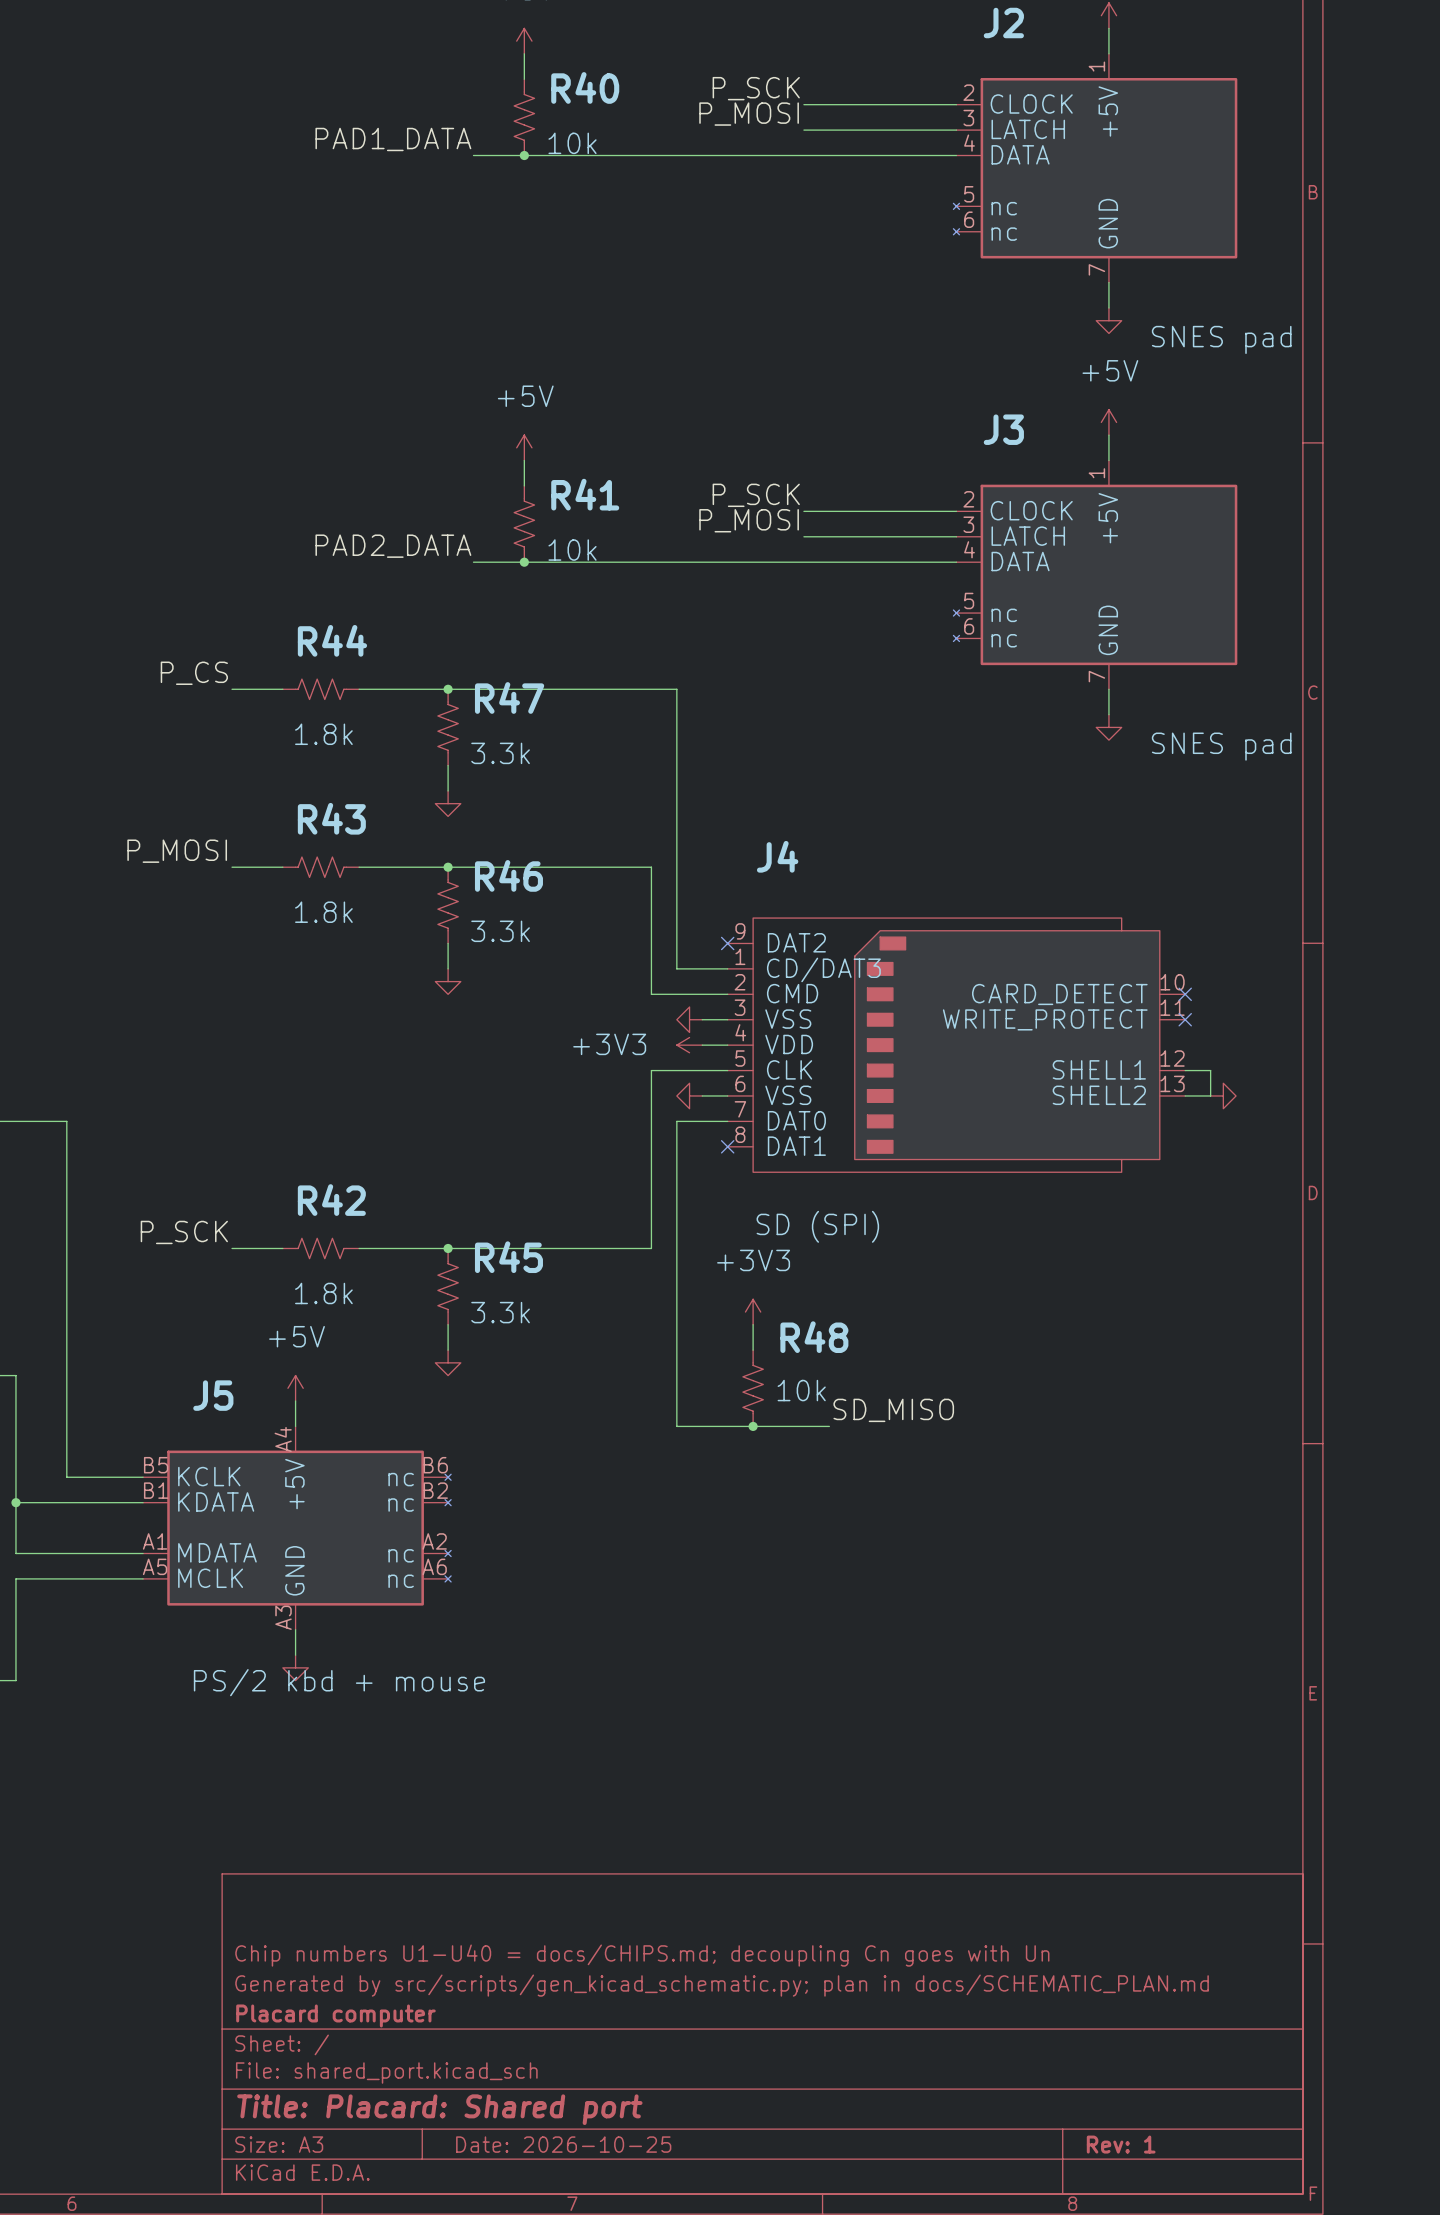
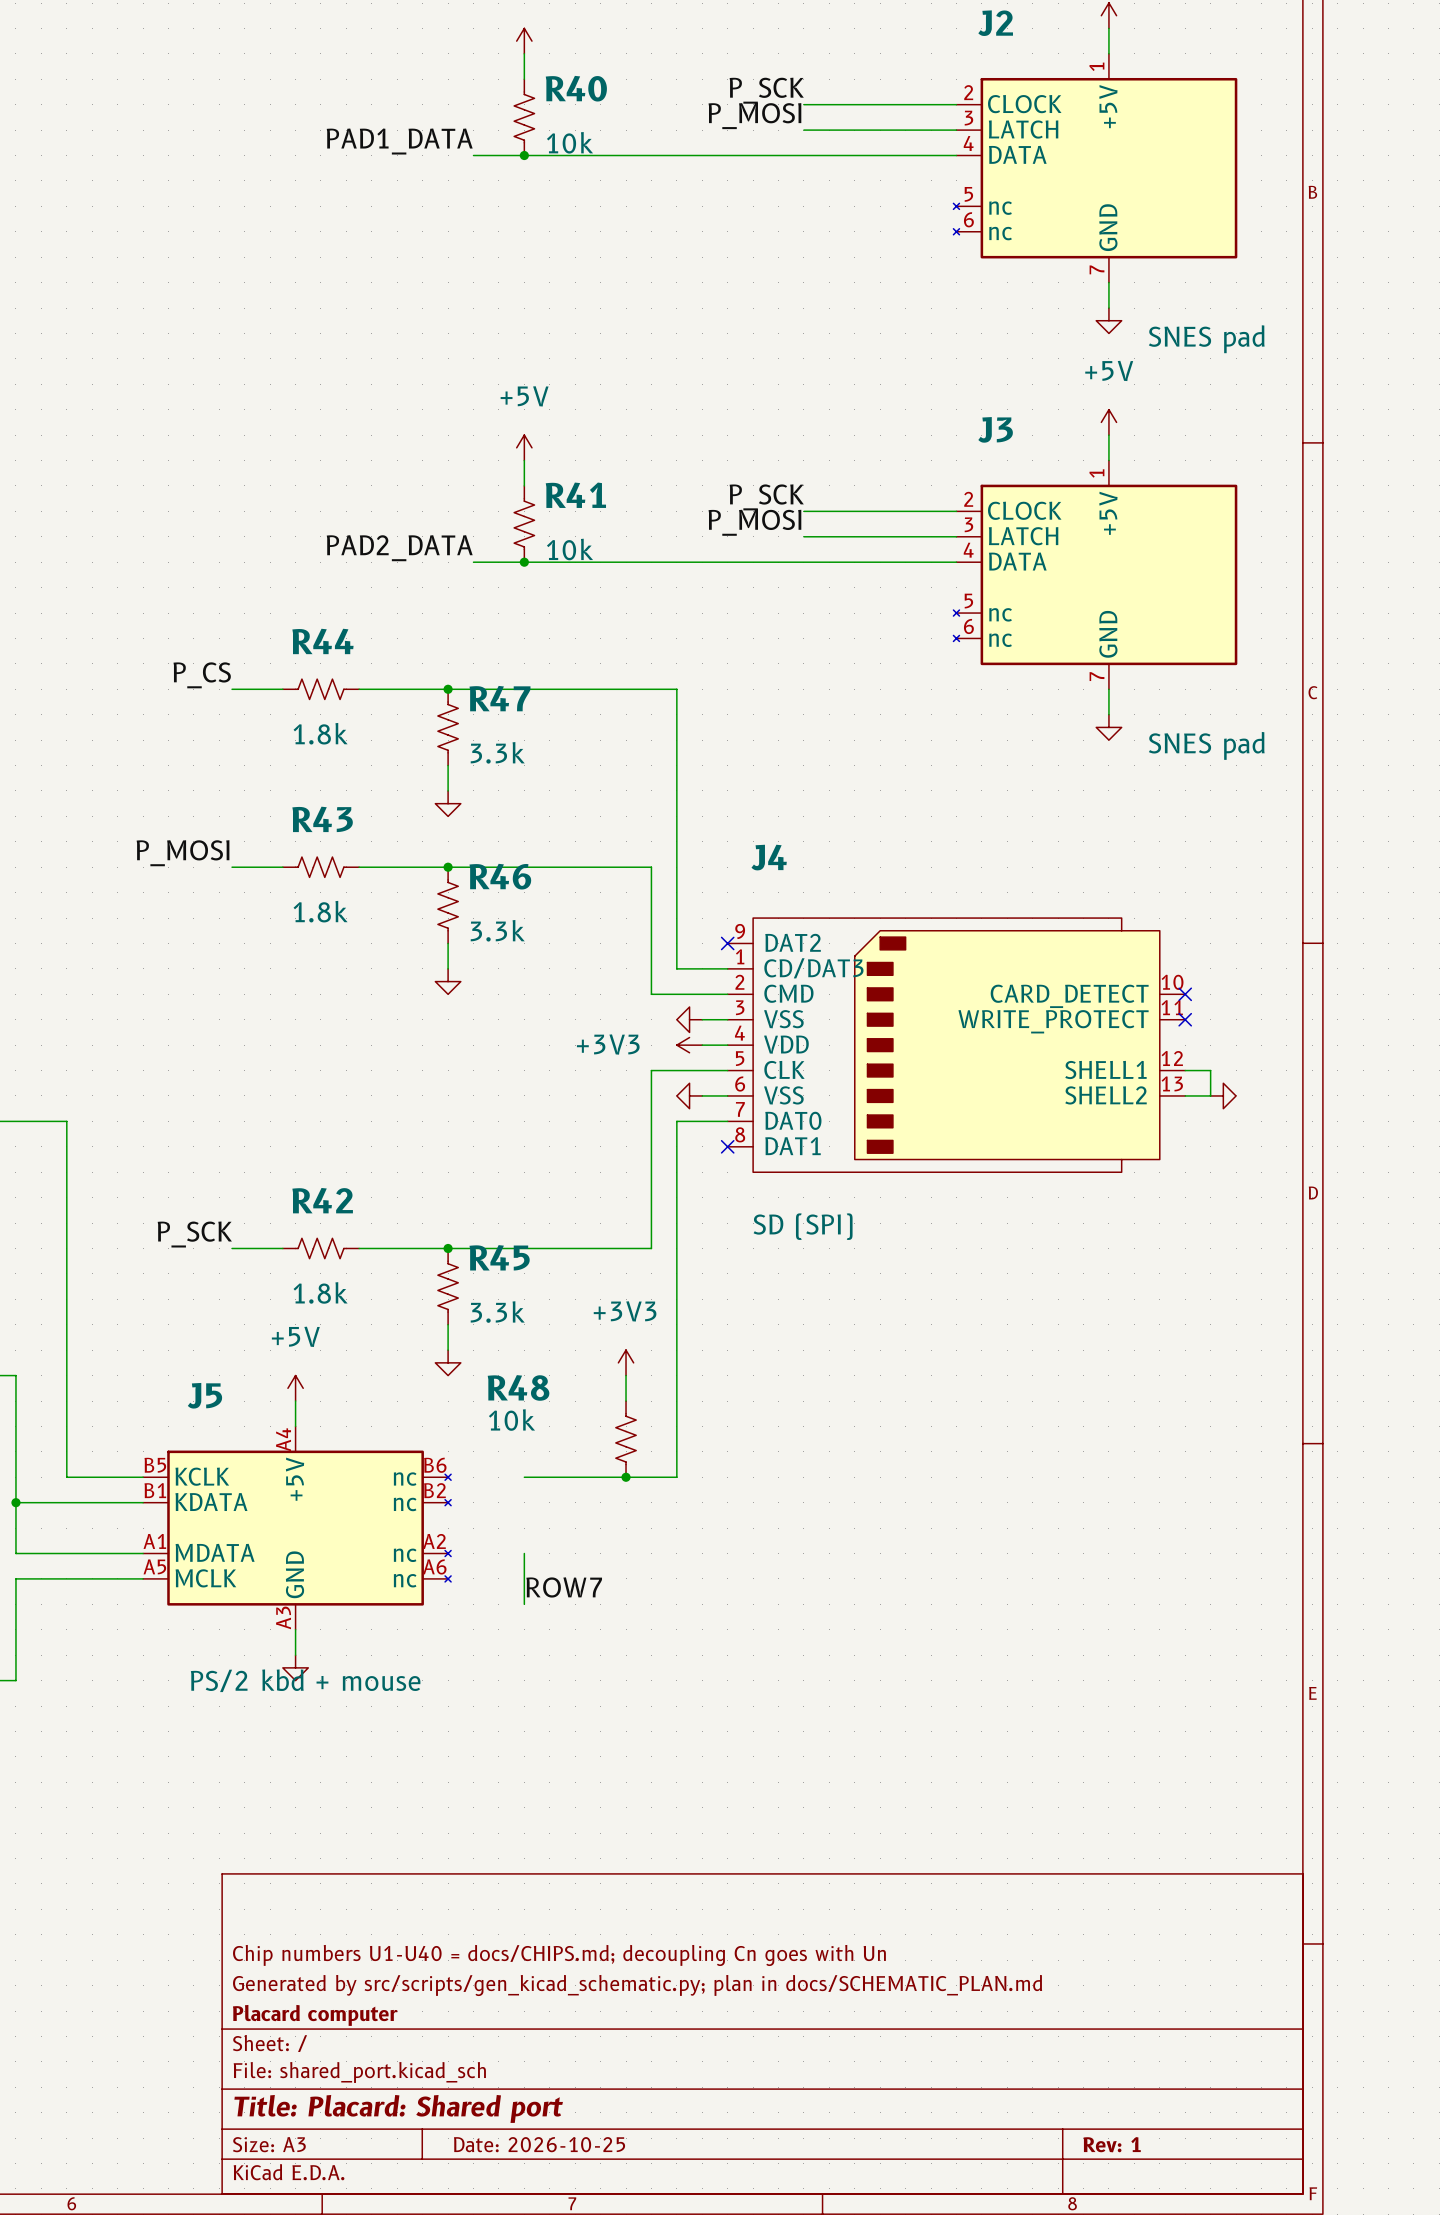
power symbol position: +3V3 (753, 1312) -> +3V3 (626, 1362)
wire: (753, 1324) (753, 1350) -> (626, 1375) (626, 1401)
R48 name position: R48 (814, 1337) -> R48 (518, 1387)
R48 position: (753, 1388) -> (626, 1439)
R48 value position: 10k (801, 1390) -> 10k (511, 1420)
label: SD_MISO (893, 1410) -> none
wire: (676, 1426) (829, 1426) -> (676, 1426) (676, 1477) (524, 1477)
junction: (753, 1426) -> none
junction: none -> (626, 1477)
wire: none -> (524, 1553) (524, 1604)
label: none -> ROW7 (564, 1587)

